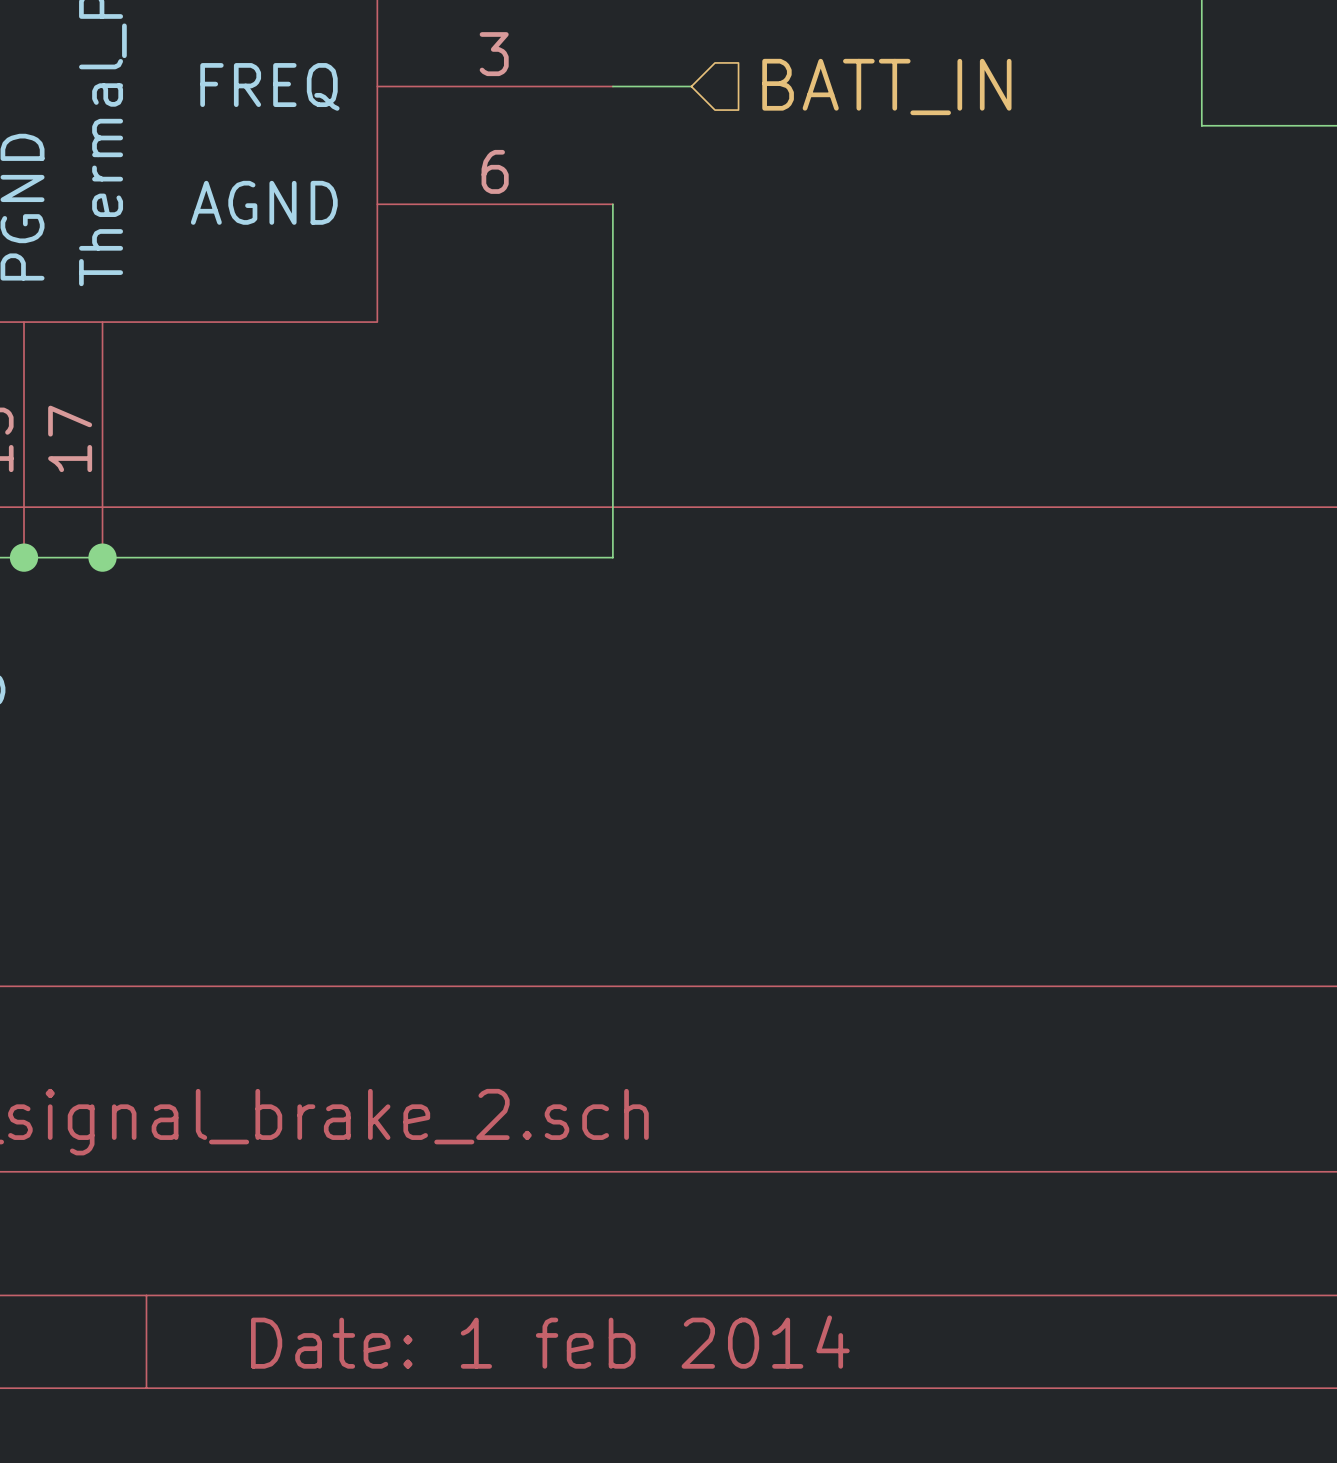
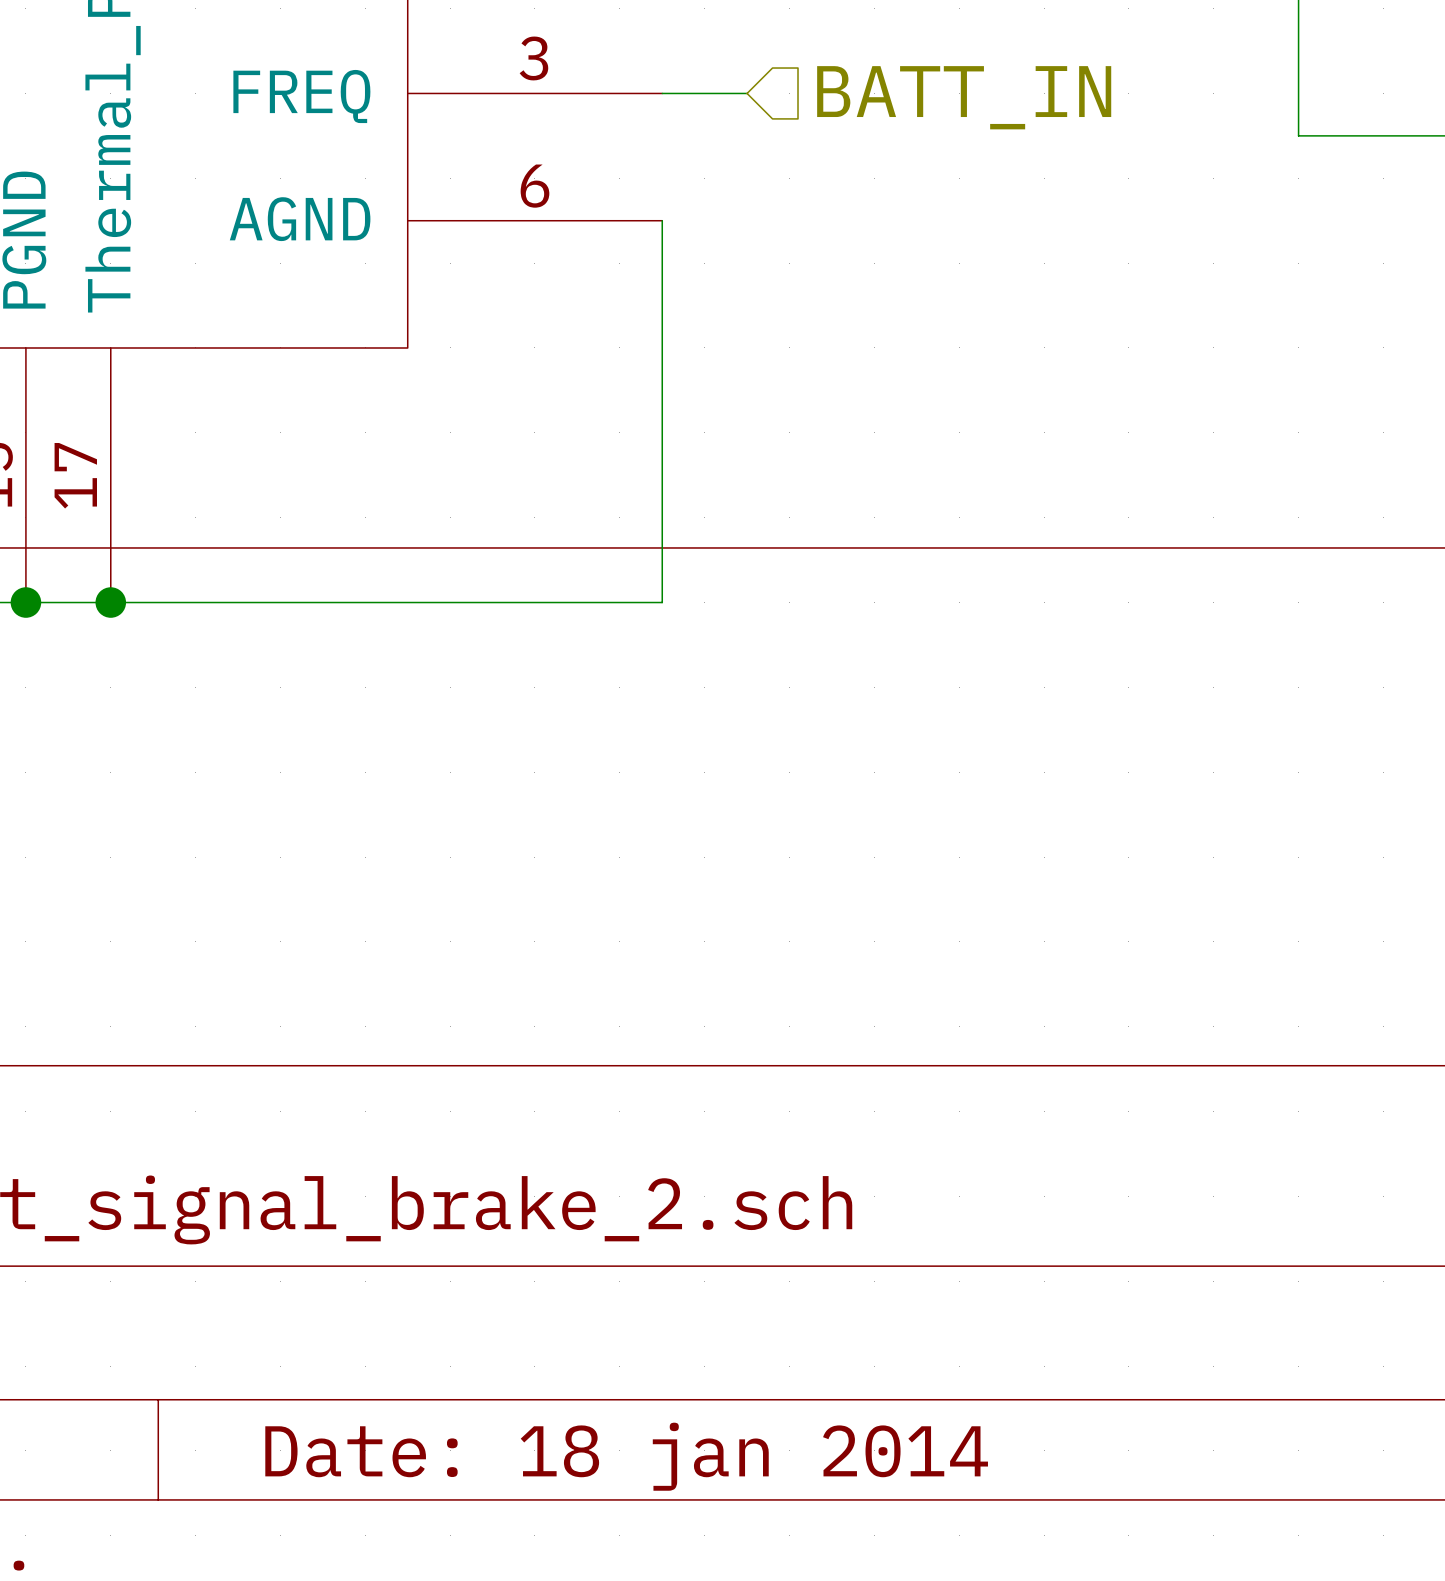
title block: Date: 1 feb 2014 (550, 1342) -> Date: 18 jan 2014 (626, 1456)

